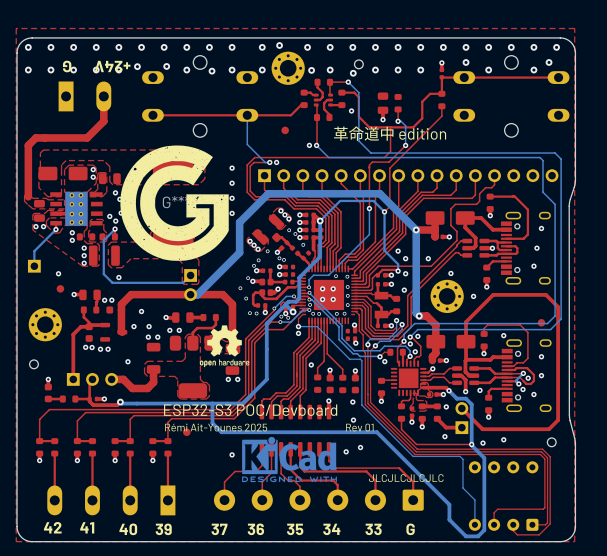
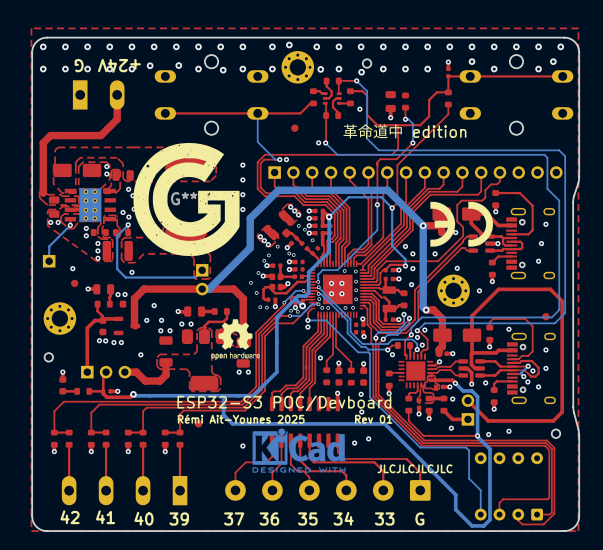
drawing: none -> [430, 201, 493, 247]

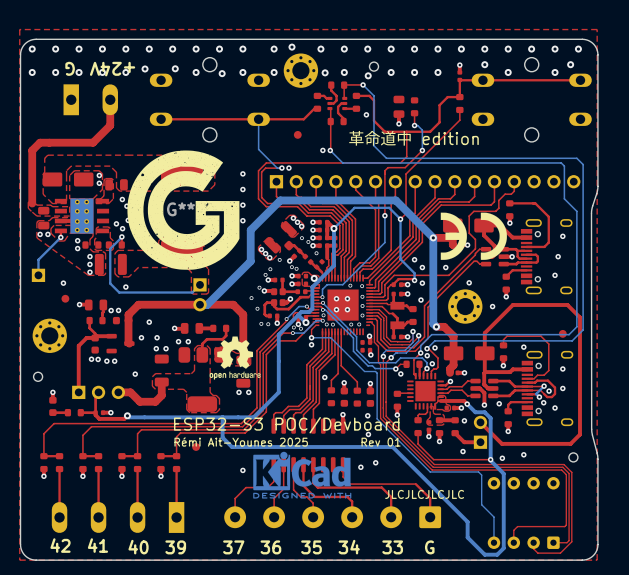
top zone outline: none -> (308, 272) (302, 273) (302, 284) (312, 288) (319, 288) (319, 276) (311, 275) (308, 272)
via: none -> (314, 278)

